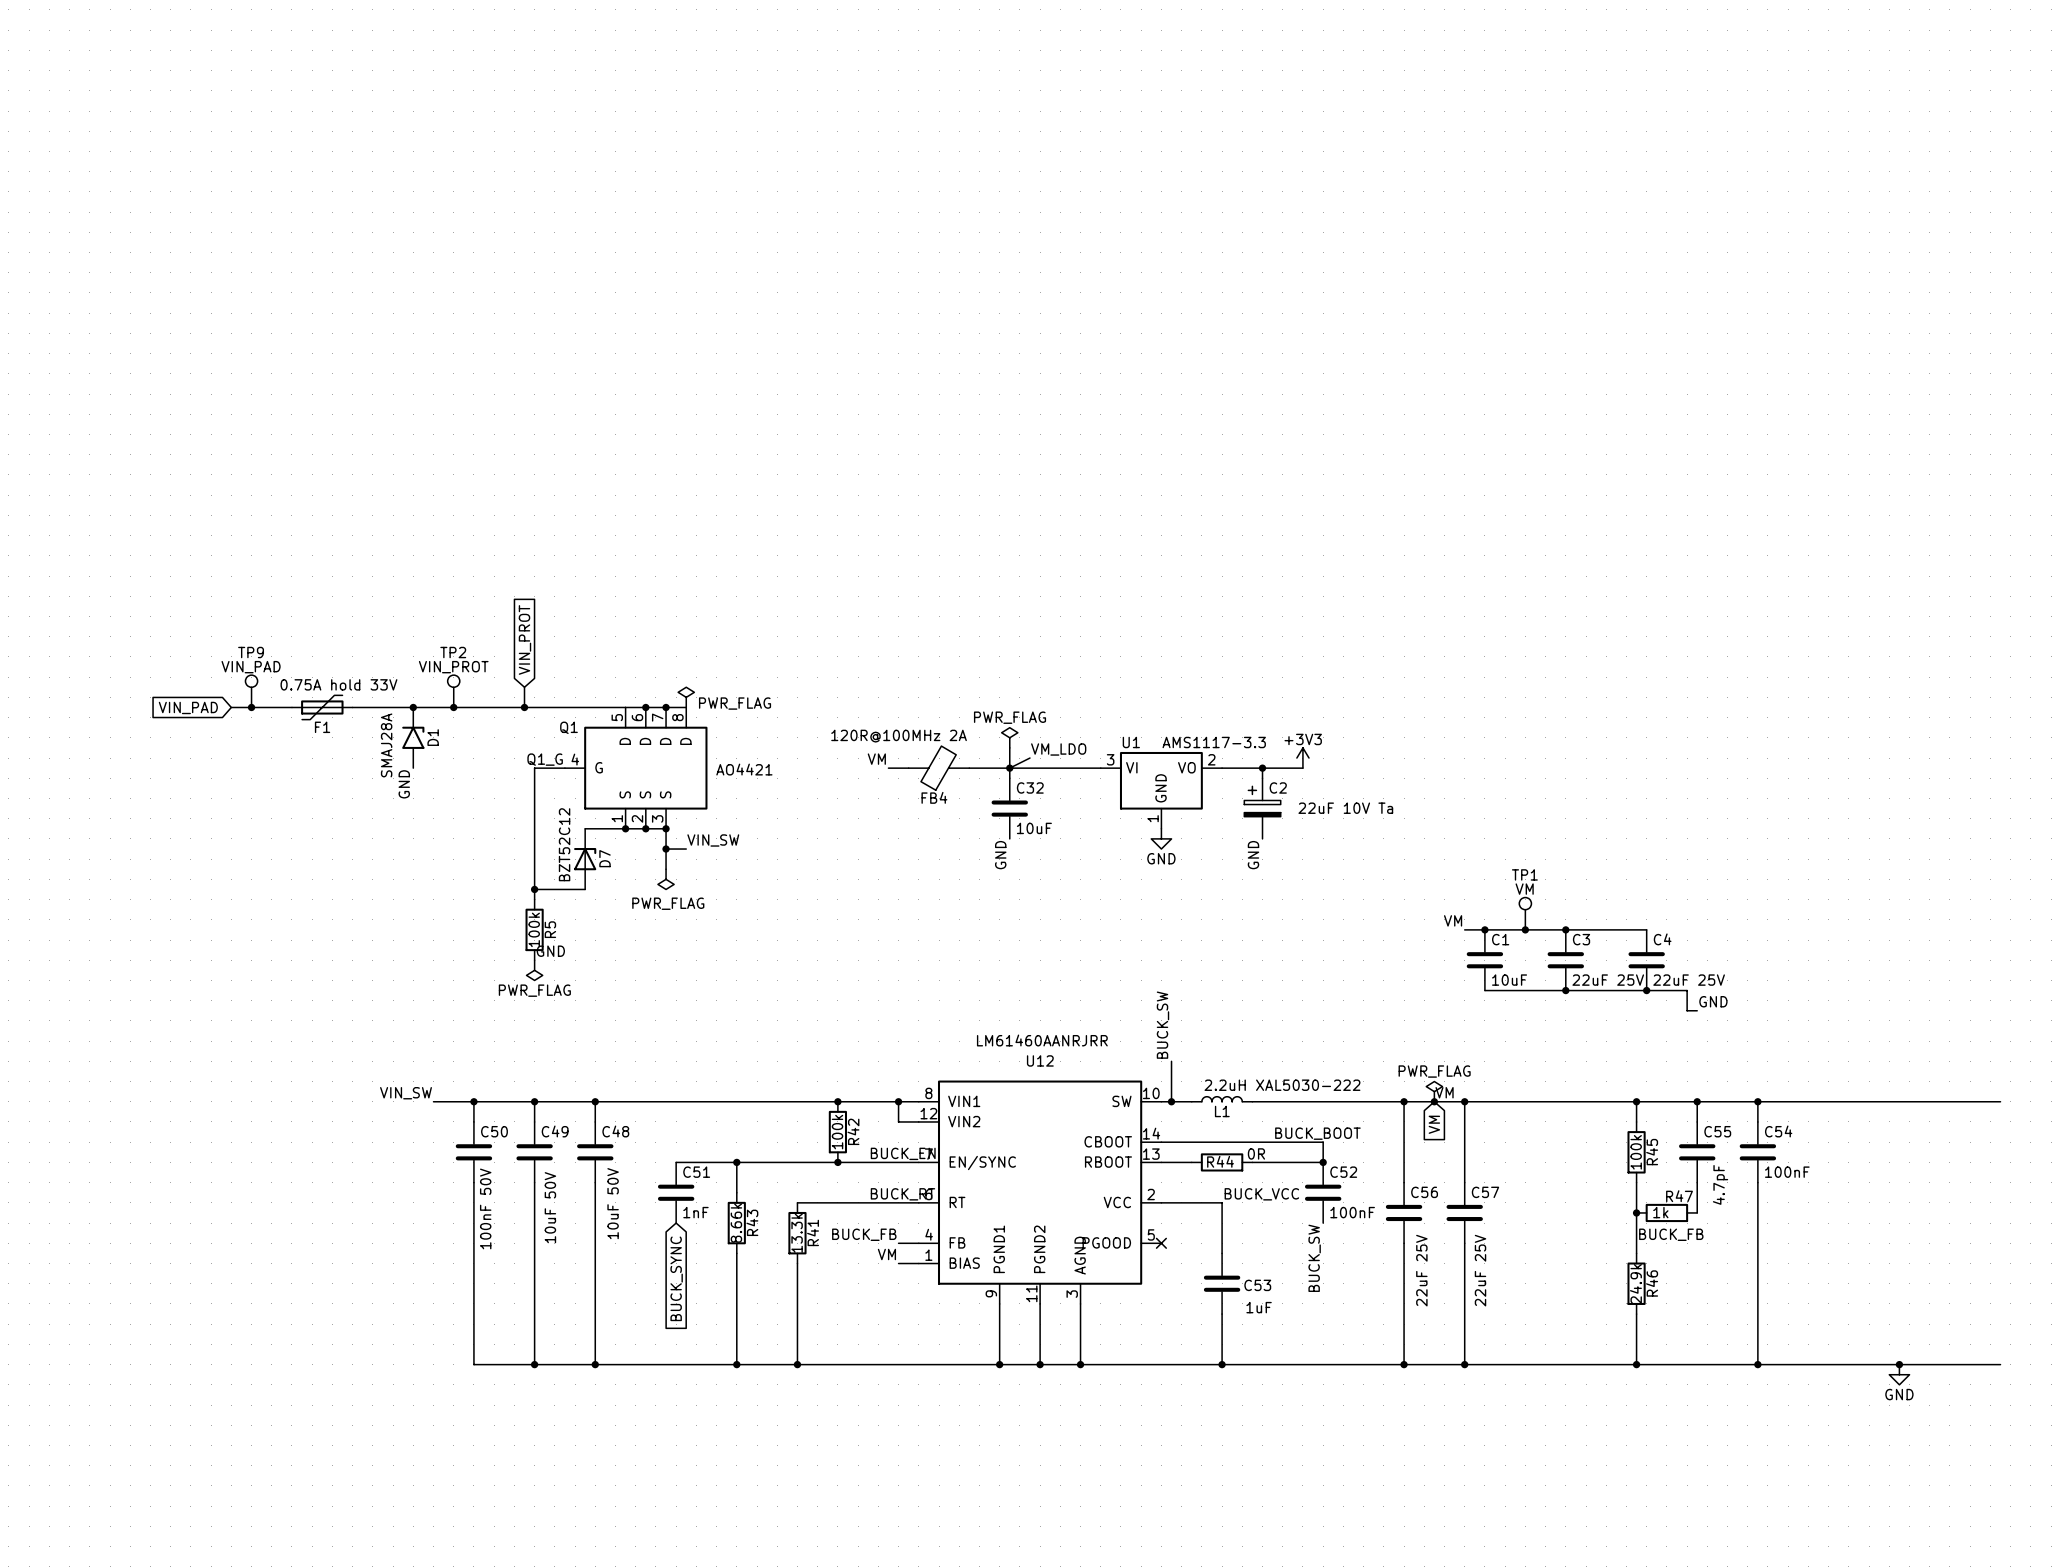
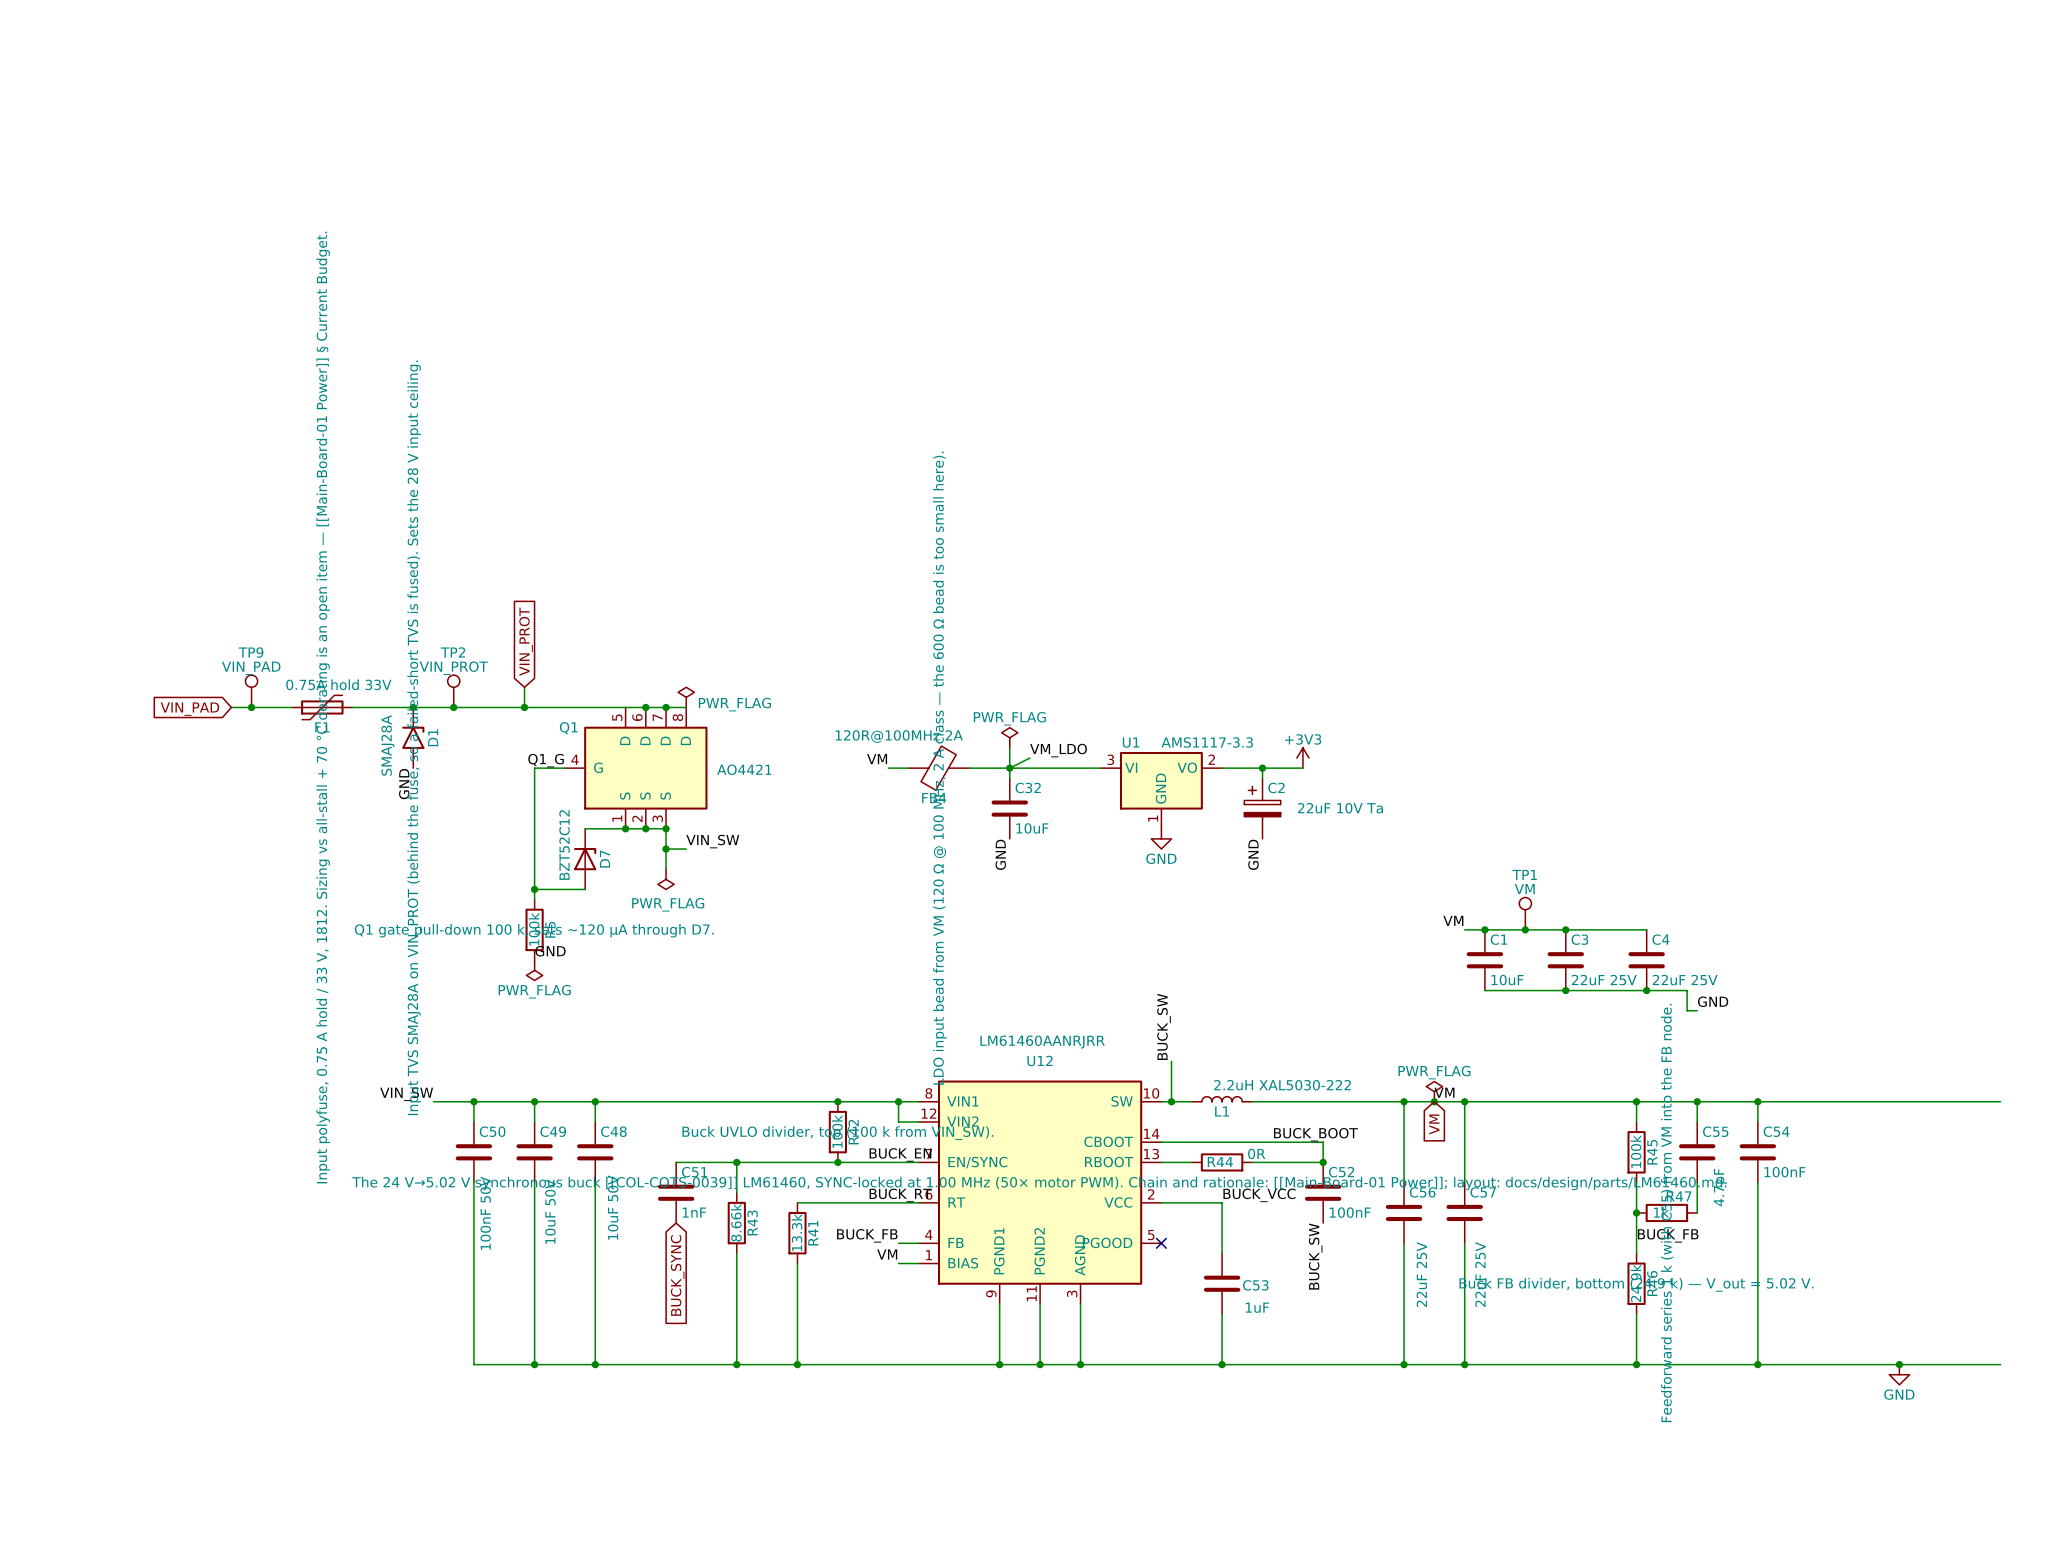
F1 text: none -> Input polyfuse, 0.75 A hold / 33 V, 1812. Sizing vs all-stall + 70 °C derating is an open item — [[Main-Board-01 Power]] § Current Budget. (323, 707)
D1 text: none -> Input TVS SMAJ28A on VIN_PROT (behind the fuse, so a failed-short TVS is fused). Sets the 28 V input ceiling. (414, 737)
FB4 text: none -> LDO input bead from VM (120 Ω @ 100 MHz, 2 A class — the 600 Ω bead is too small here). (939, 768)
R5 text: none -> Q1 gate pull-down 100 k; sets ~120 µA through D7. (534, 930)
R42 text: none -> Buck UVLO divider, top (100 k from VIN_SW). (837, 1133)
U12 text: none -> The 24 V→5.02 V synchronous buck [[COL-COTS-0039]] LM61460, SYNC-locked at 1.00 MHz (50× motor PWM). Chain and rationale: [[Main-Board-01 Power]]; layout: docs/design/parts/LM61460.md. (1039, 1183)
R47 text: none -> Feedforward series 1 k (with C55) from VM into the FB node. (1667, 1213)
R46 text: none -> Buck FB divider, bottom (24.9 k) — V_out = 5.02 V. (1636, 1284)

